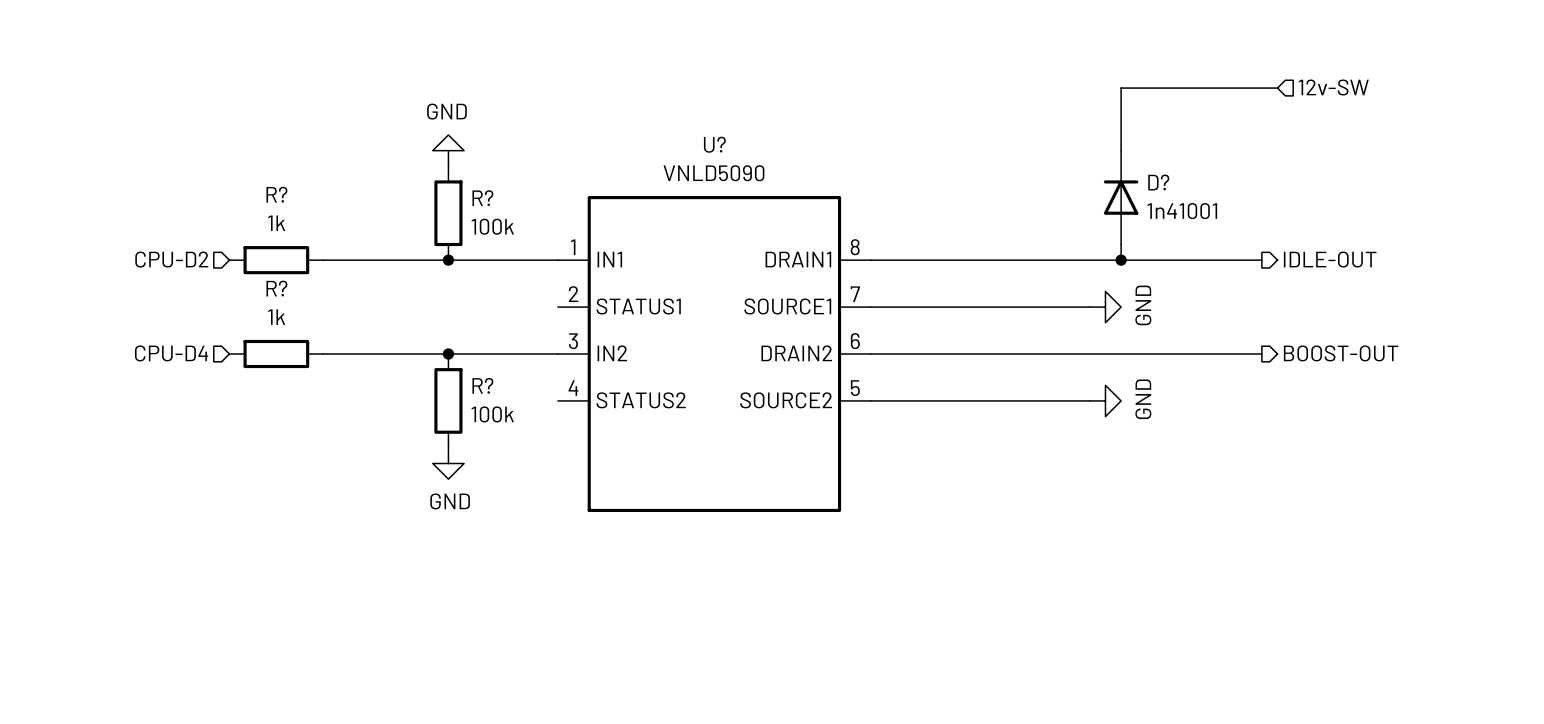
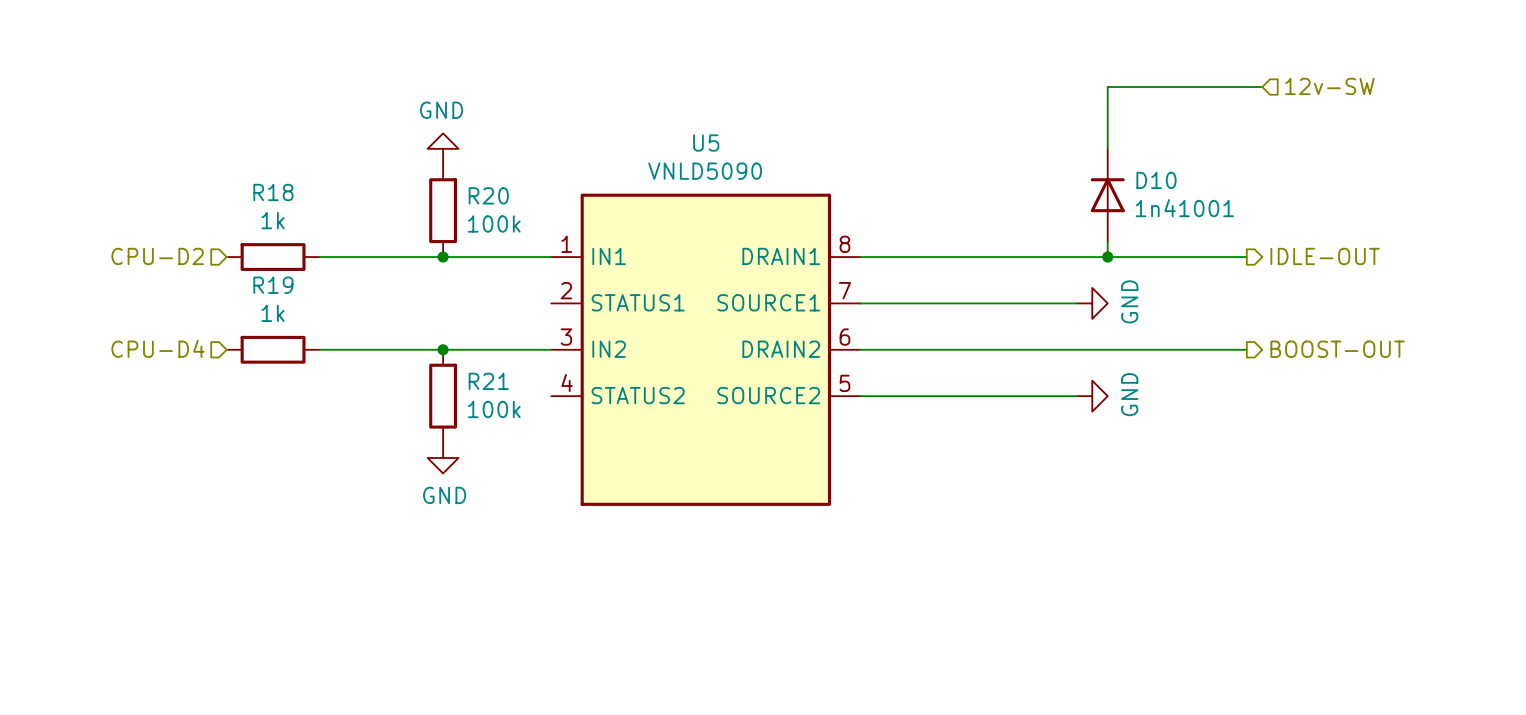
U? name: U? (714, 144) -> U5 (706, 143)
D? name: D? (1158, 182) -> D10 (1156, 180)
R? name: R? (276, 194) -> R18 (273, 192)
R? name: R? (482, 198) -> R20 (488, 195)
R? name: R? (276, 288) -> R19 (273, 285)
R? name: R? (482, 385) -> R21 (488, 381)

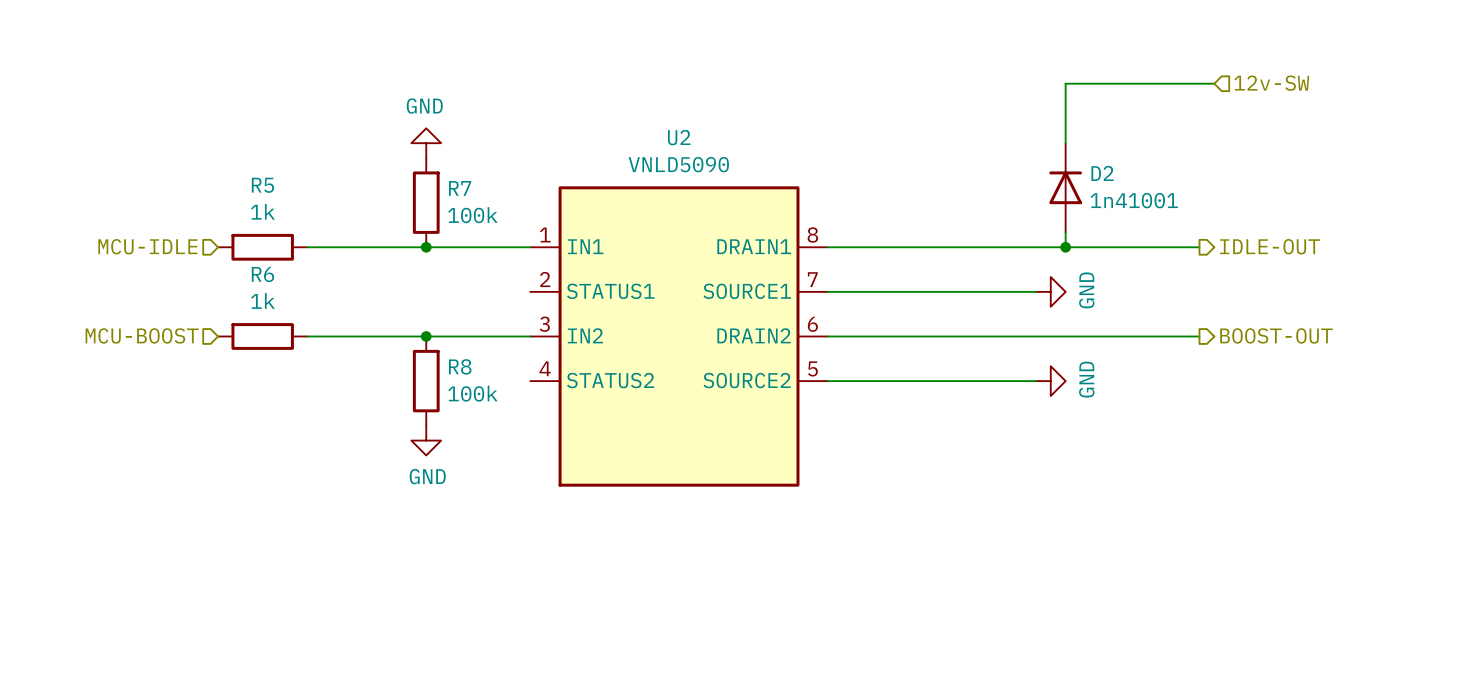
U5 name: U5 (706, 143) -> U2 (679, 137)
D10 name: D10 (1156, 180) -> D2 (1102, 173)
R18 name: R18 (273, 192) -> R5 (262, 185)
R20 name: R20 (488, 195) -> R7 (460, 188)
hierarchical label: CPU-D2 (157, 256) -> MCU-IDLE (147, 246)
R19 name: R19 (273, 285) -> R6 (262, 274)
hierarchical label: CPU-D4 (158, 348) -> MCU-BOOST (142, 335)
R21 name: R21 (488, 381) -> R8 (460, 366)

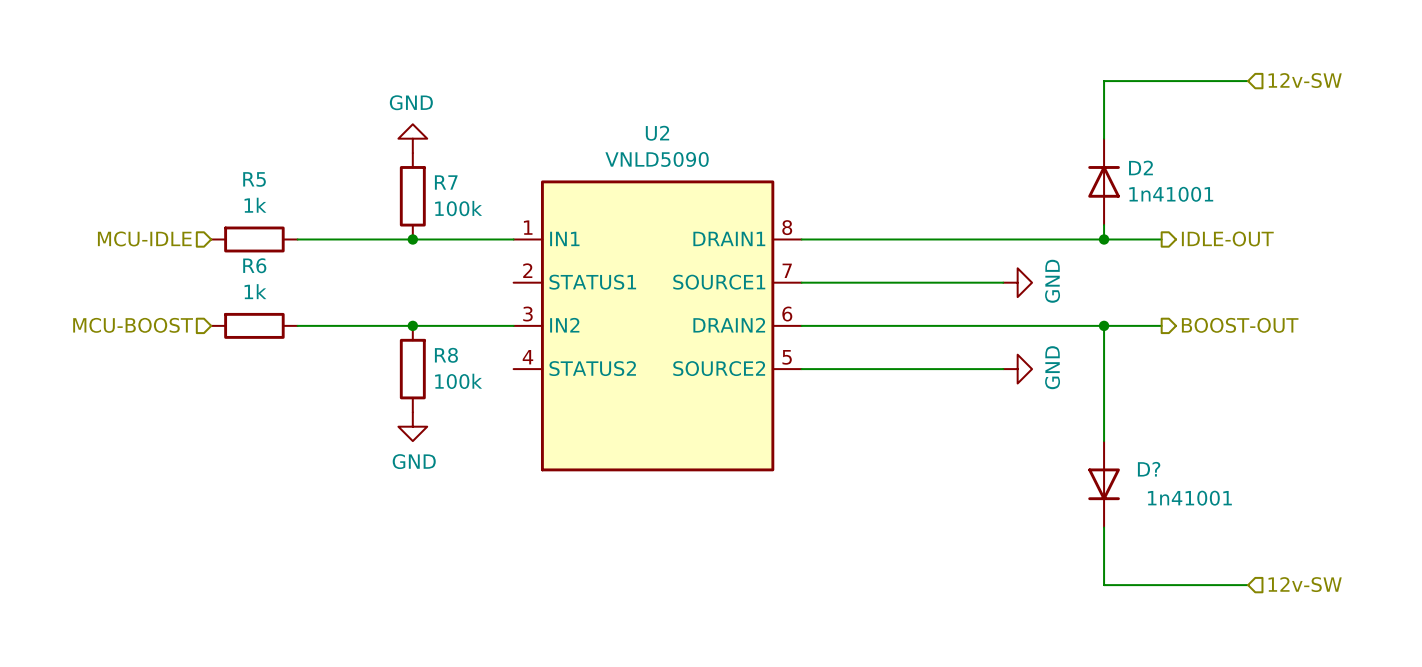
wire: (1139, 83) (1065, 83) (1065, 143) -> (1104, 81) (1104, 138)
wire: none -> (1176, 81) (1248, 81)
hierarchical label position: 12v-SW (1271, 83) -> 12v-SW (1305, 80)
D2 position: (1065, 187) -> (1104, 181)
wire: (1065, 232) (1065, 247) -> (1104, 225) (1104, 239)
junction: (1065, 247) -> none
junction: none -> (1104, 239)
wire: none -> (1104, 325) (1104, 441)
junction: none -> (1104, 325)
D?: none -> 1n41001 (1104, 484)
wire: none -> (1104, 527) (1104, 585) (1248, 585)
hierarchical label: none -> 12v-SW (1305, 584)

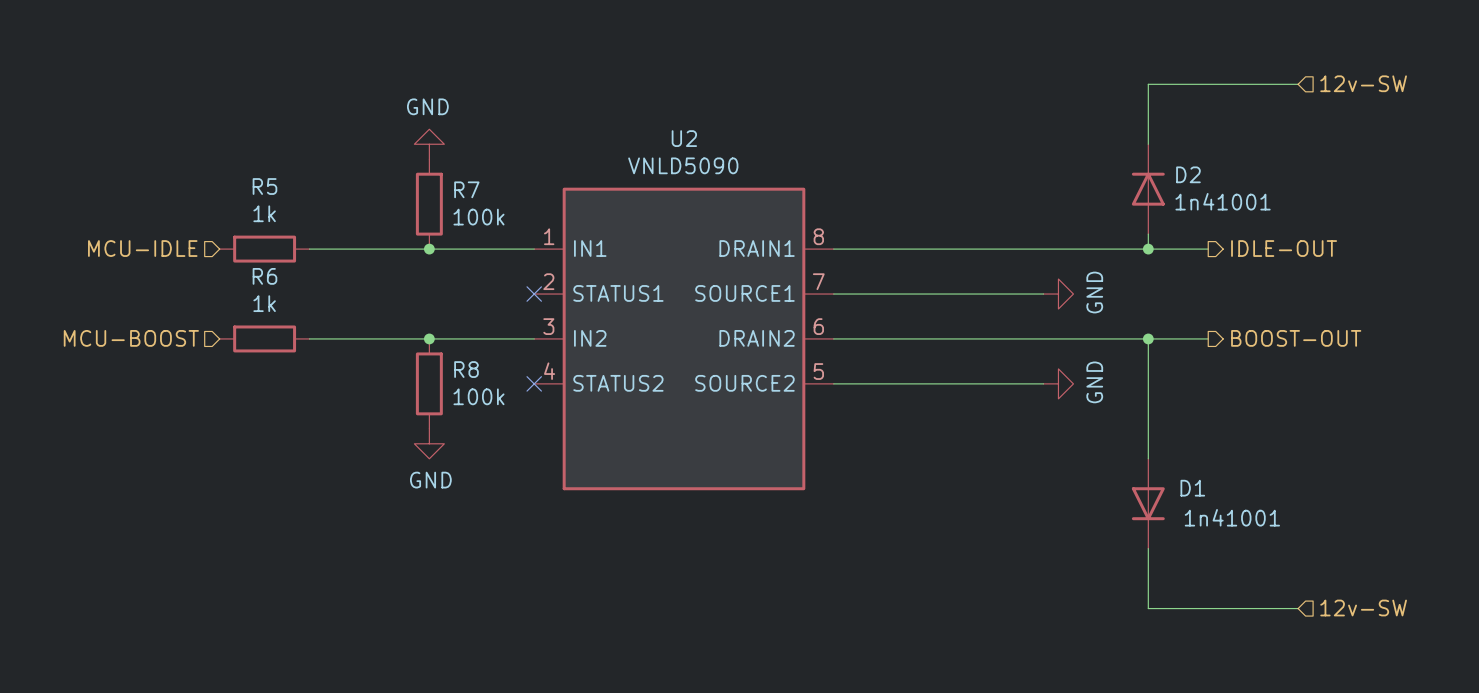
no-connect mark: none -> (534, 294)
no-connect mark: none -> (534, 383)
D? name: D? (1149, 469) -> D1 (1192, 488)

